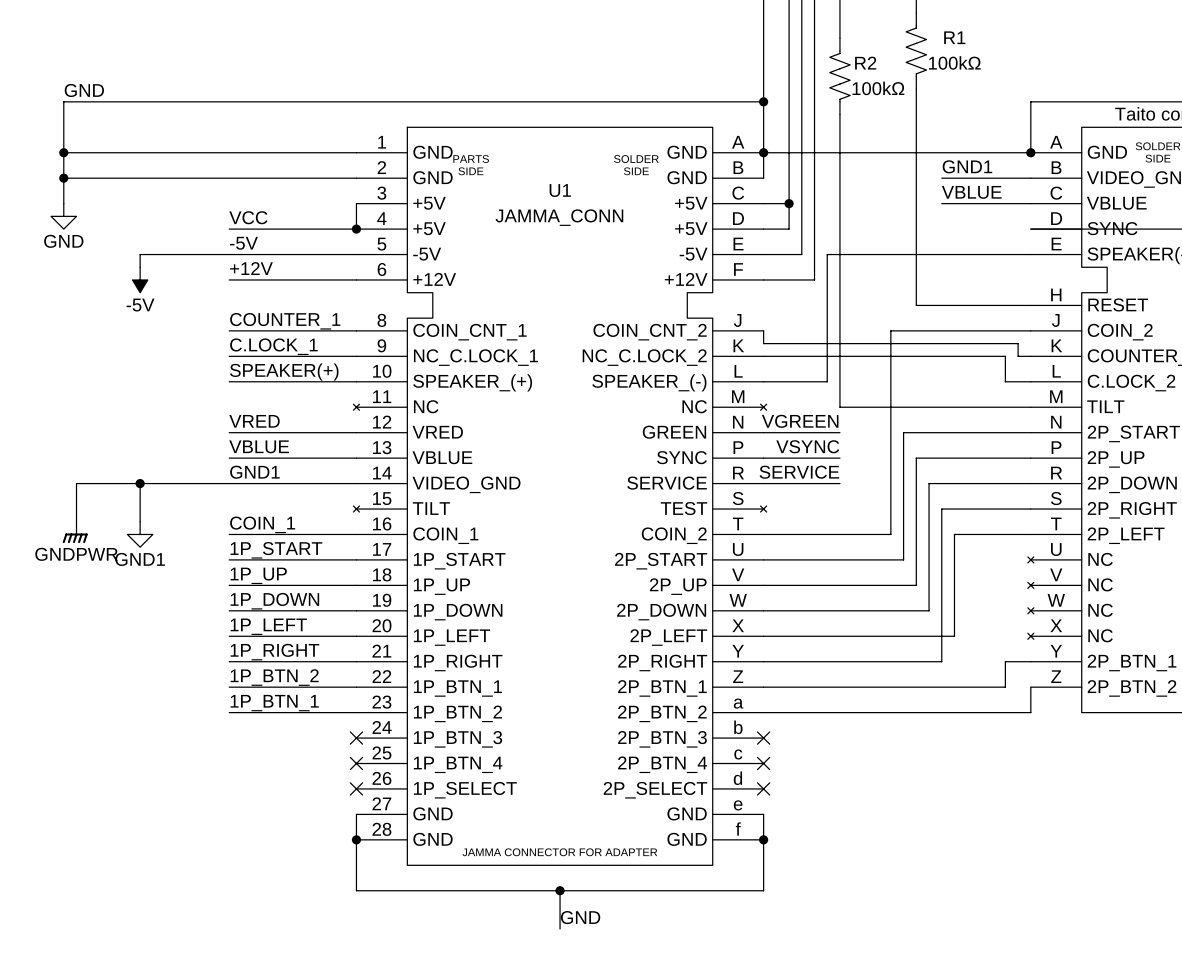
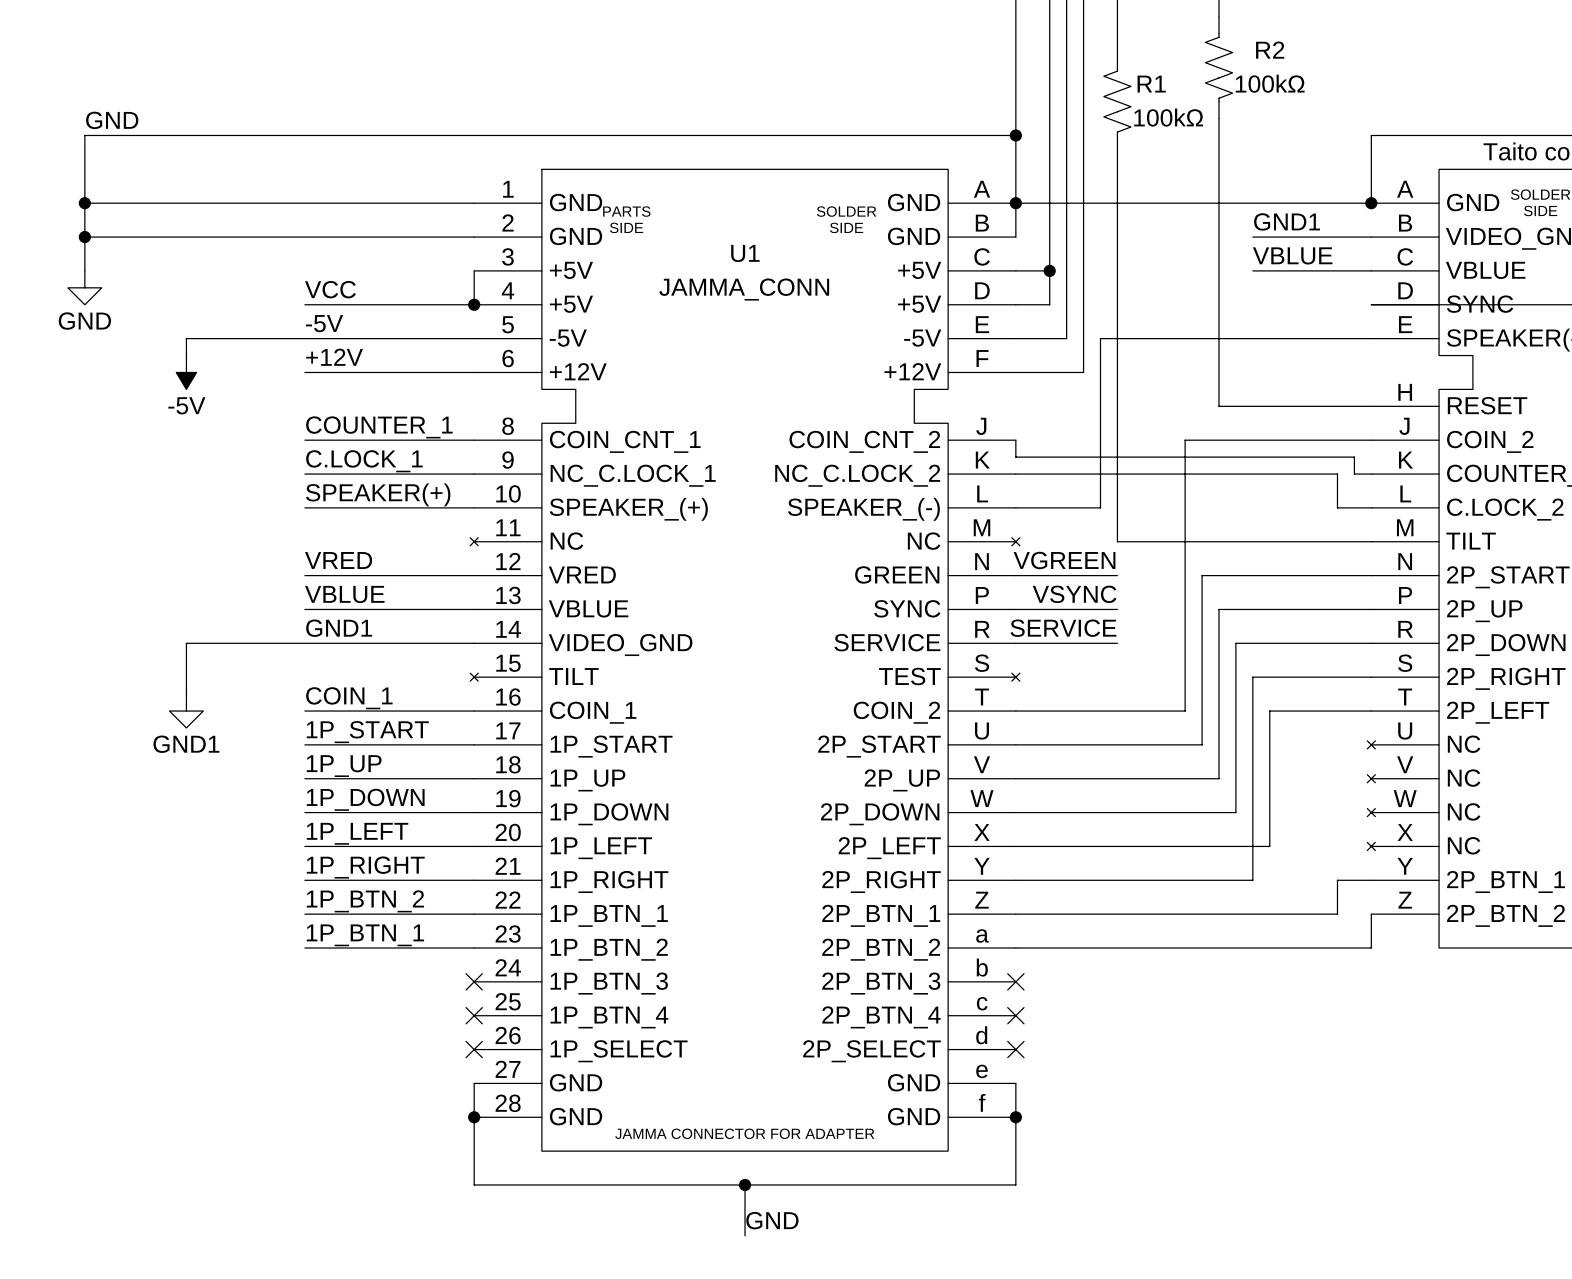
R1 name: R1 (954, 37) -> R2 (1270, 50)
R2 name: R2 (865, 63) -> R1 (1151, 84)
wire: (140, 483) (76, 483) (76, 521) -> none
junction: (140, 483) -> none
power symbol: GNDPWR (75, 532) -> none

